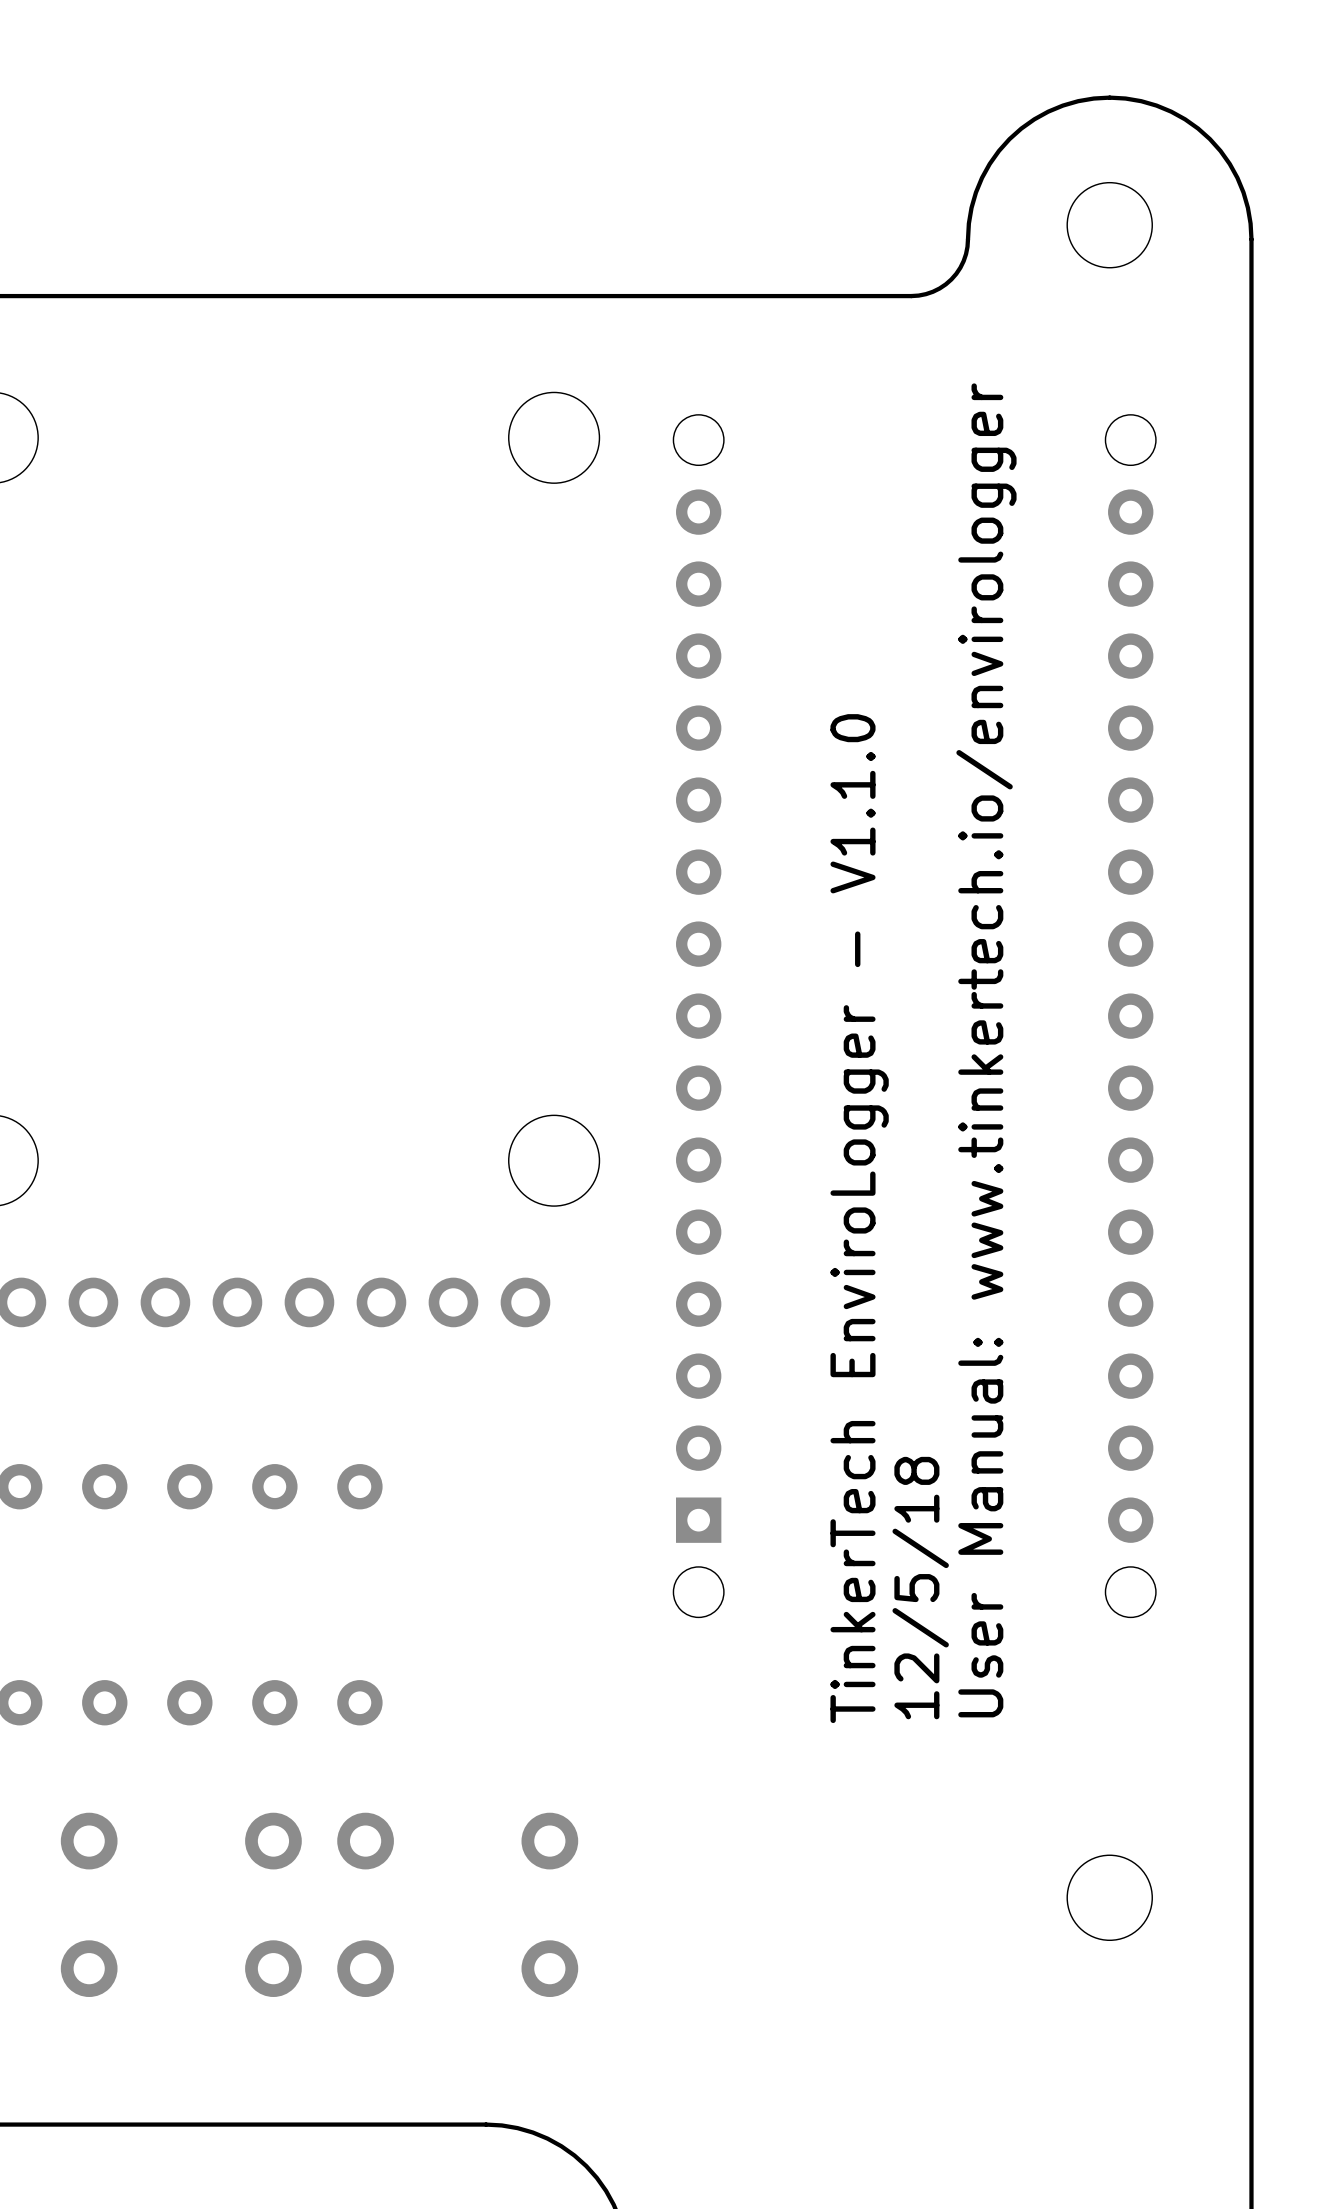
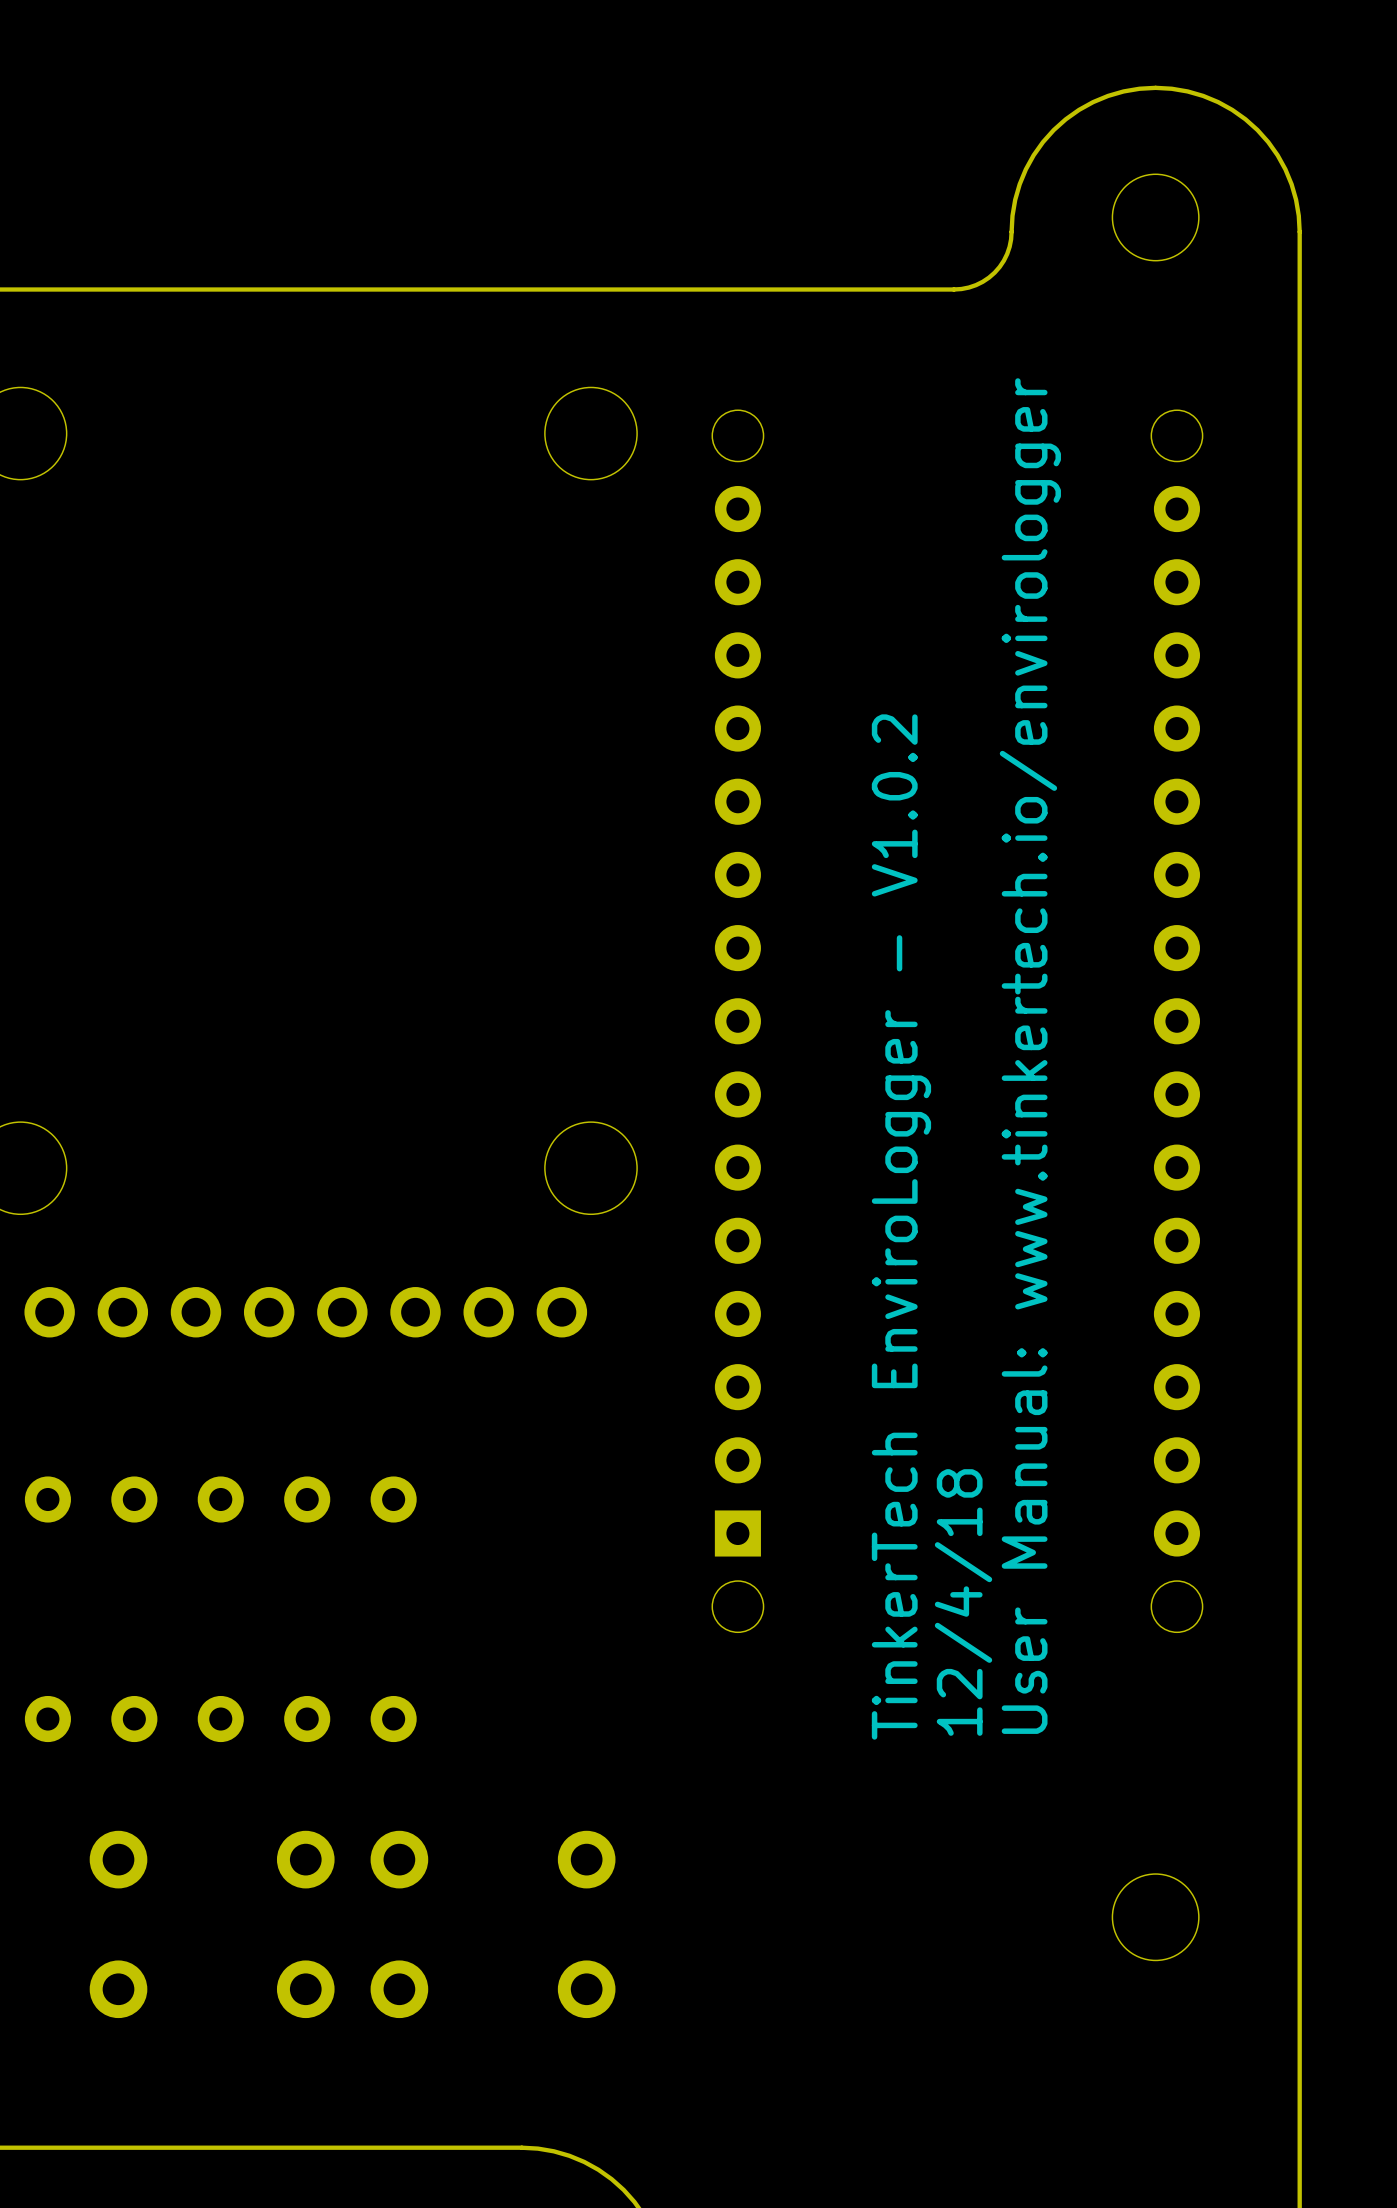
text: TinkerTech EnviroLogger - V1.1.0 (859, 1218) -> TinkerTech EnviroLogger - V1.0.2 (901, 1227)
text: 12/5/18 (920, 1588) -> 12/4/18 (963, 1602)

